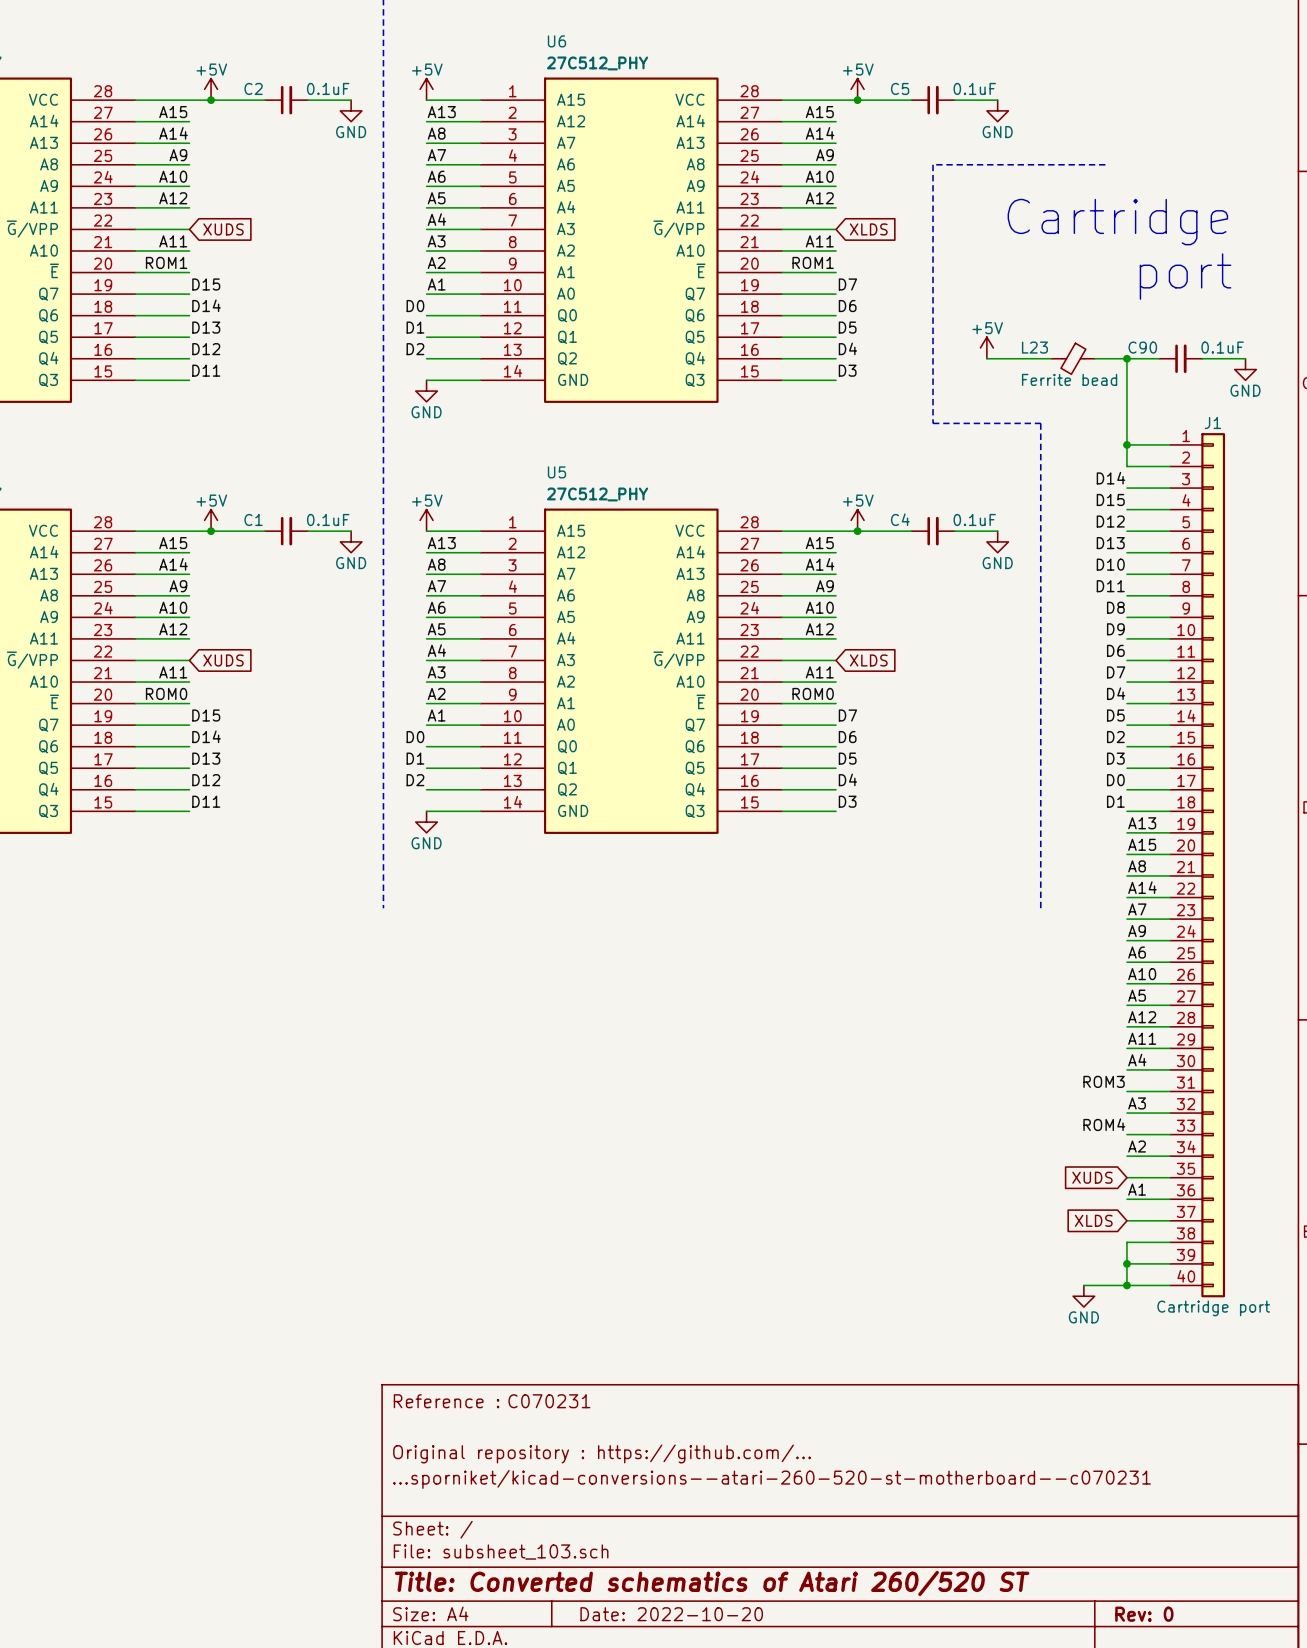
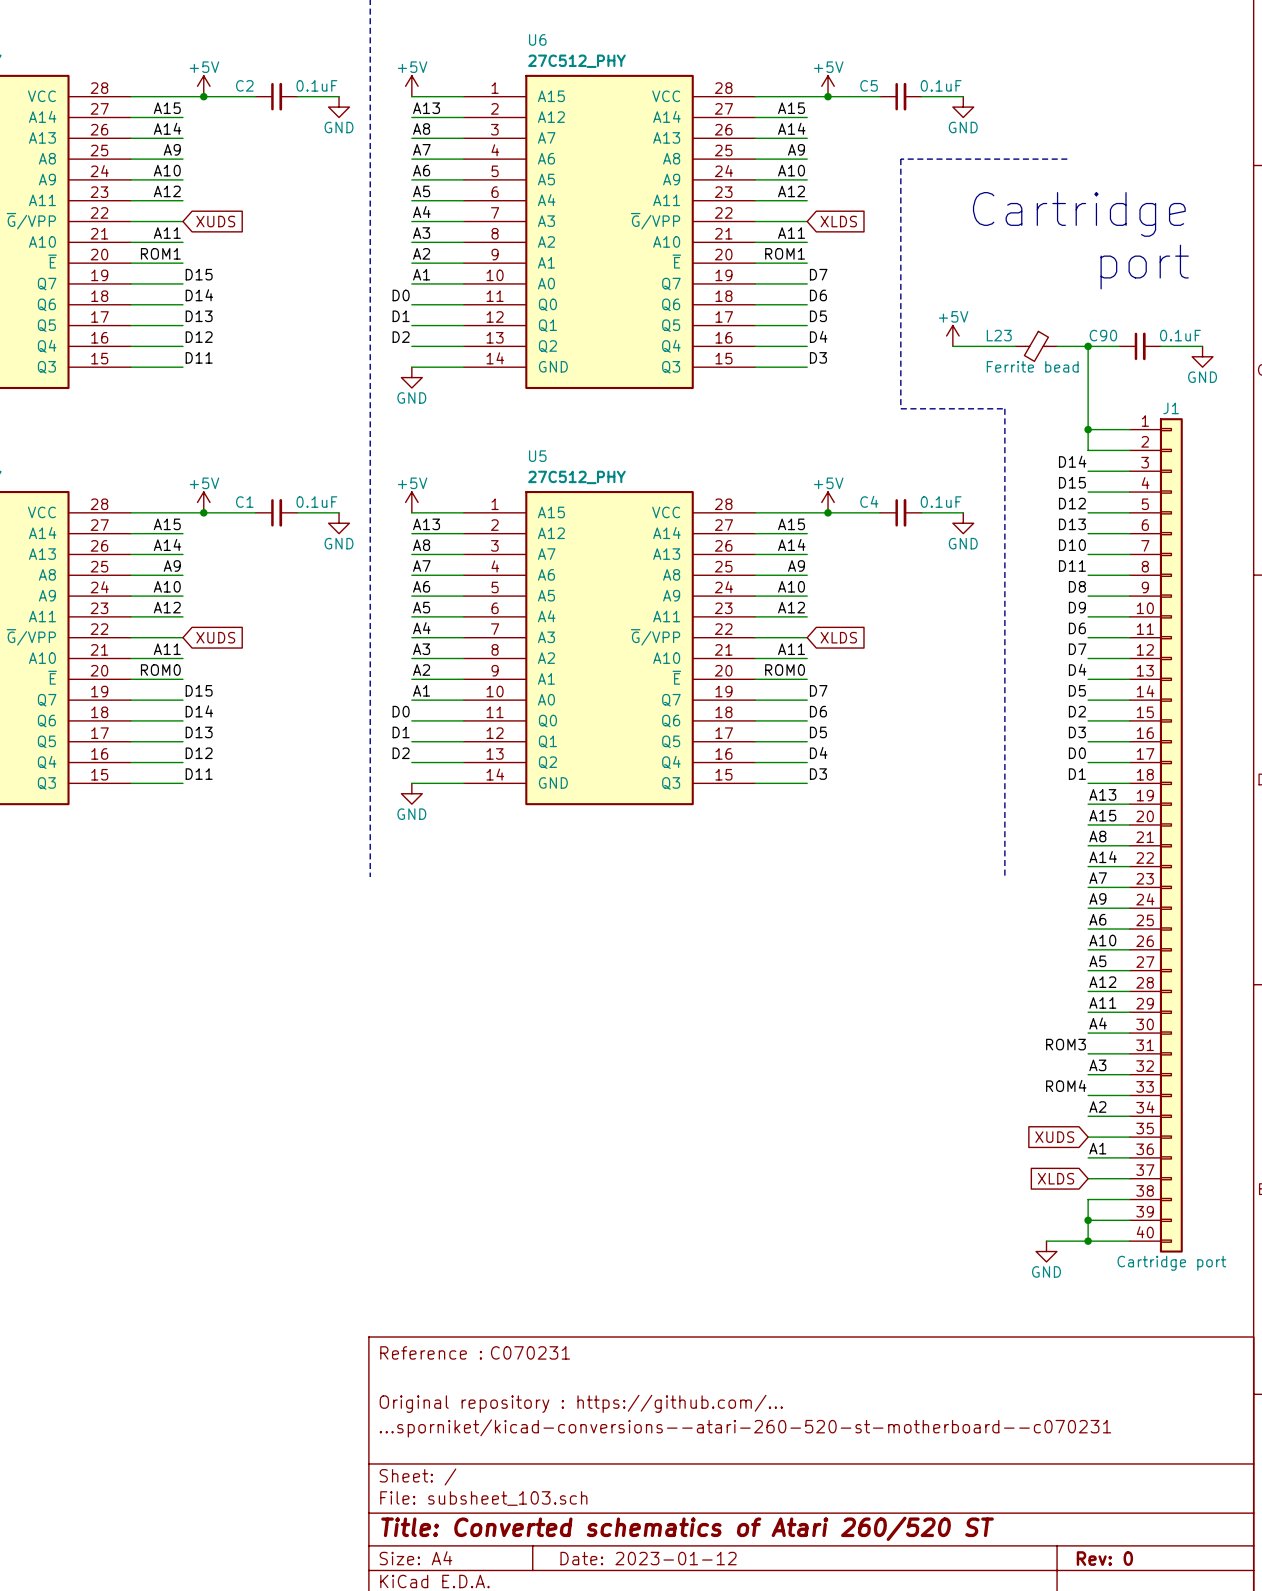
title block: Date: 2022-10-20 (671, 1614) -> Date: 2023-01-12 (648, 1558)

